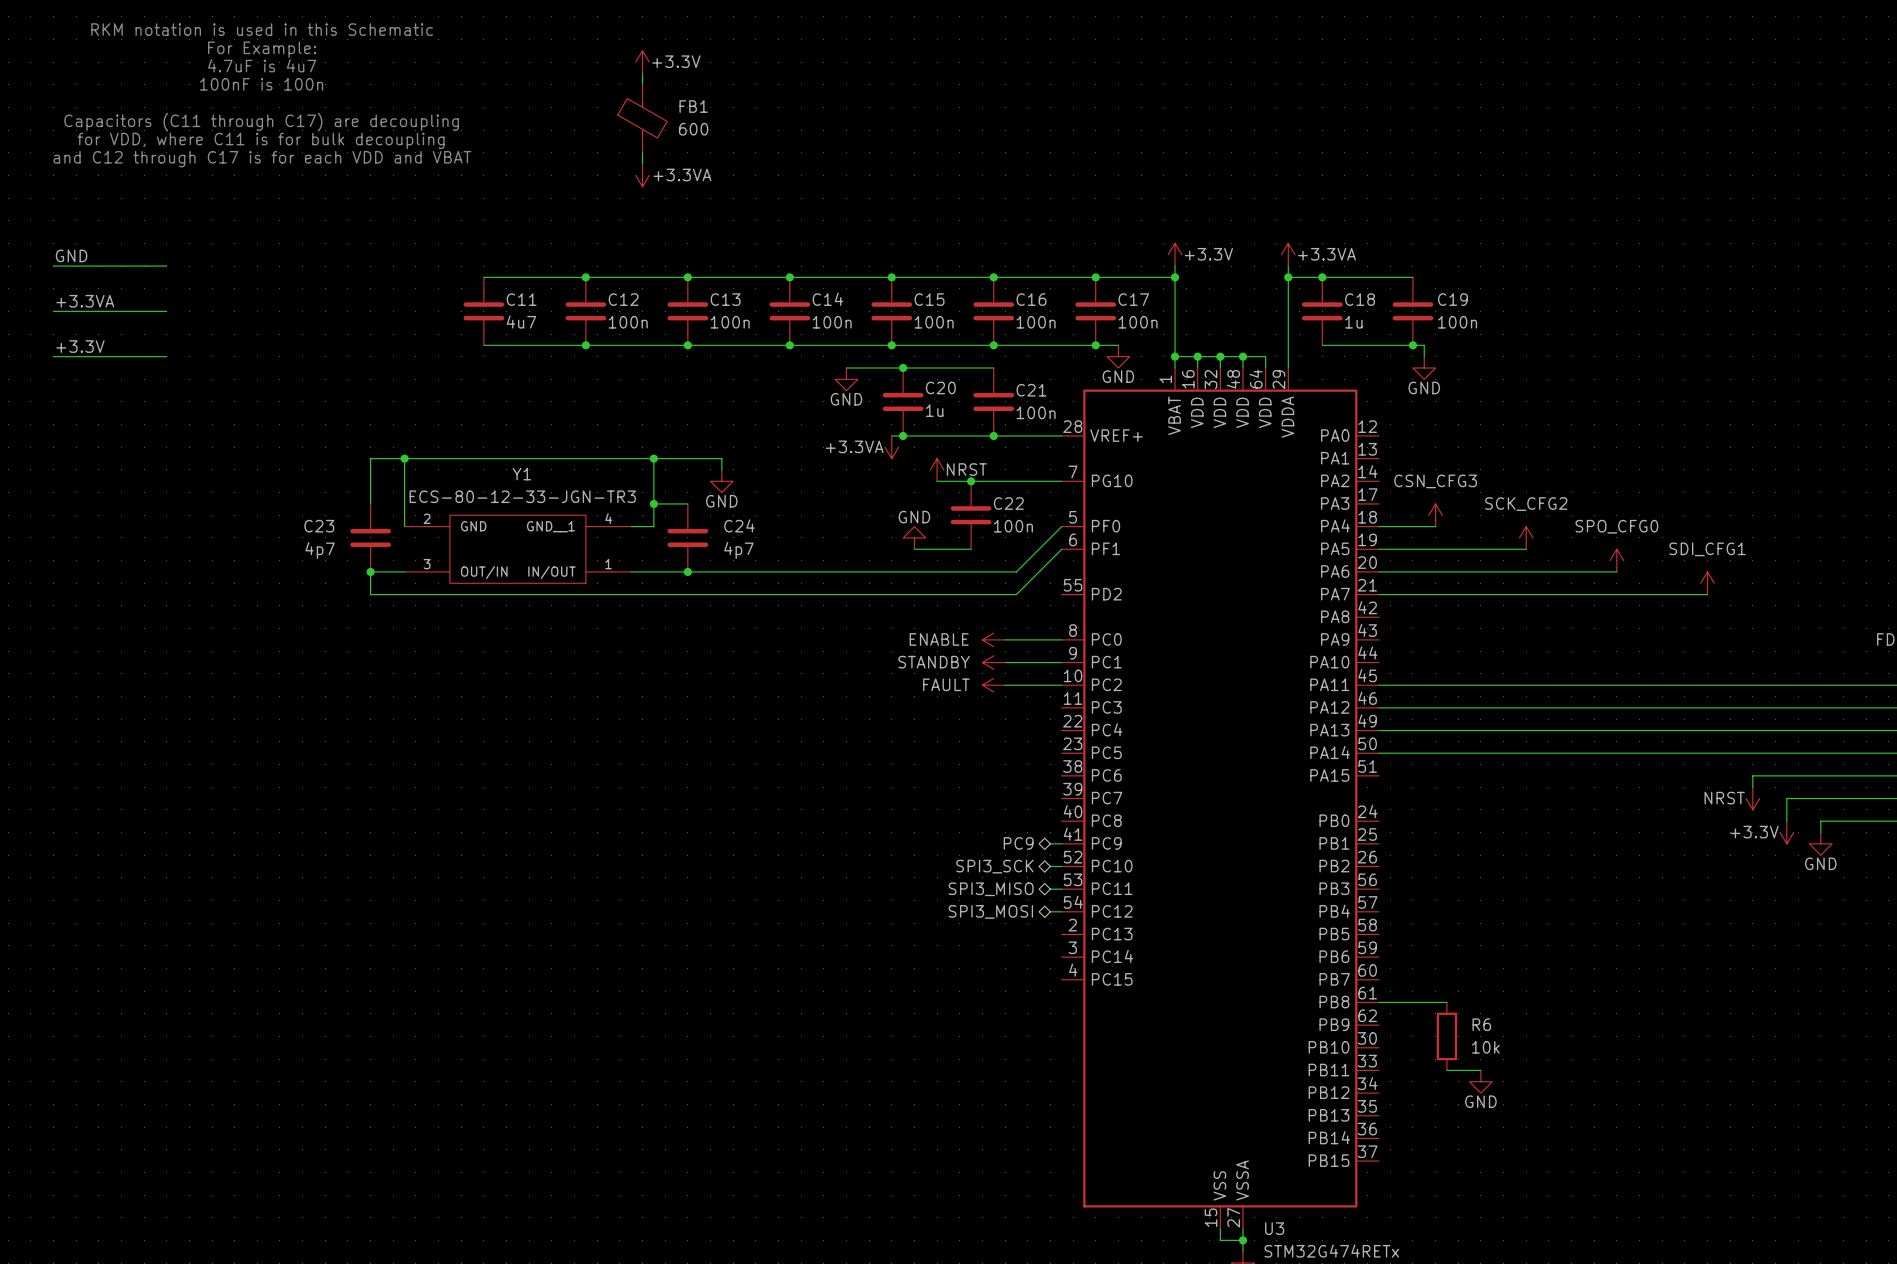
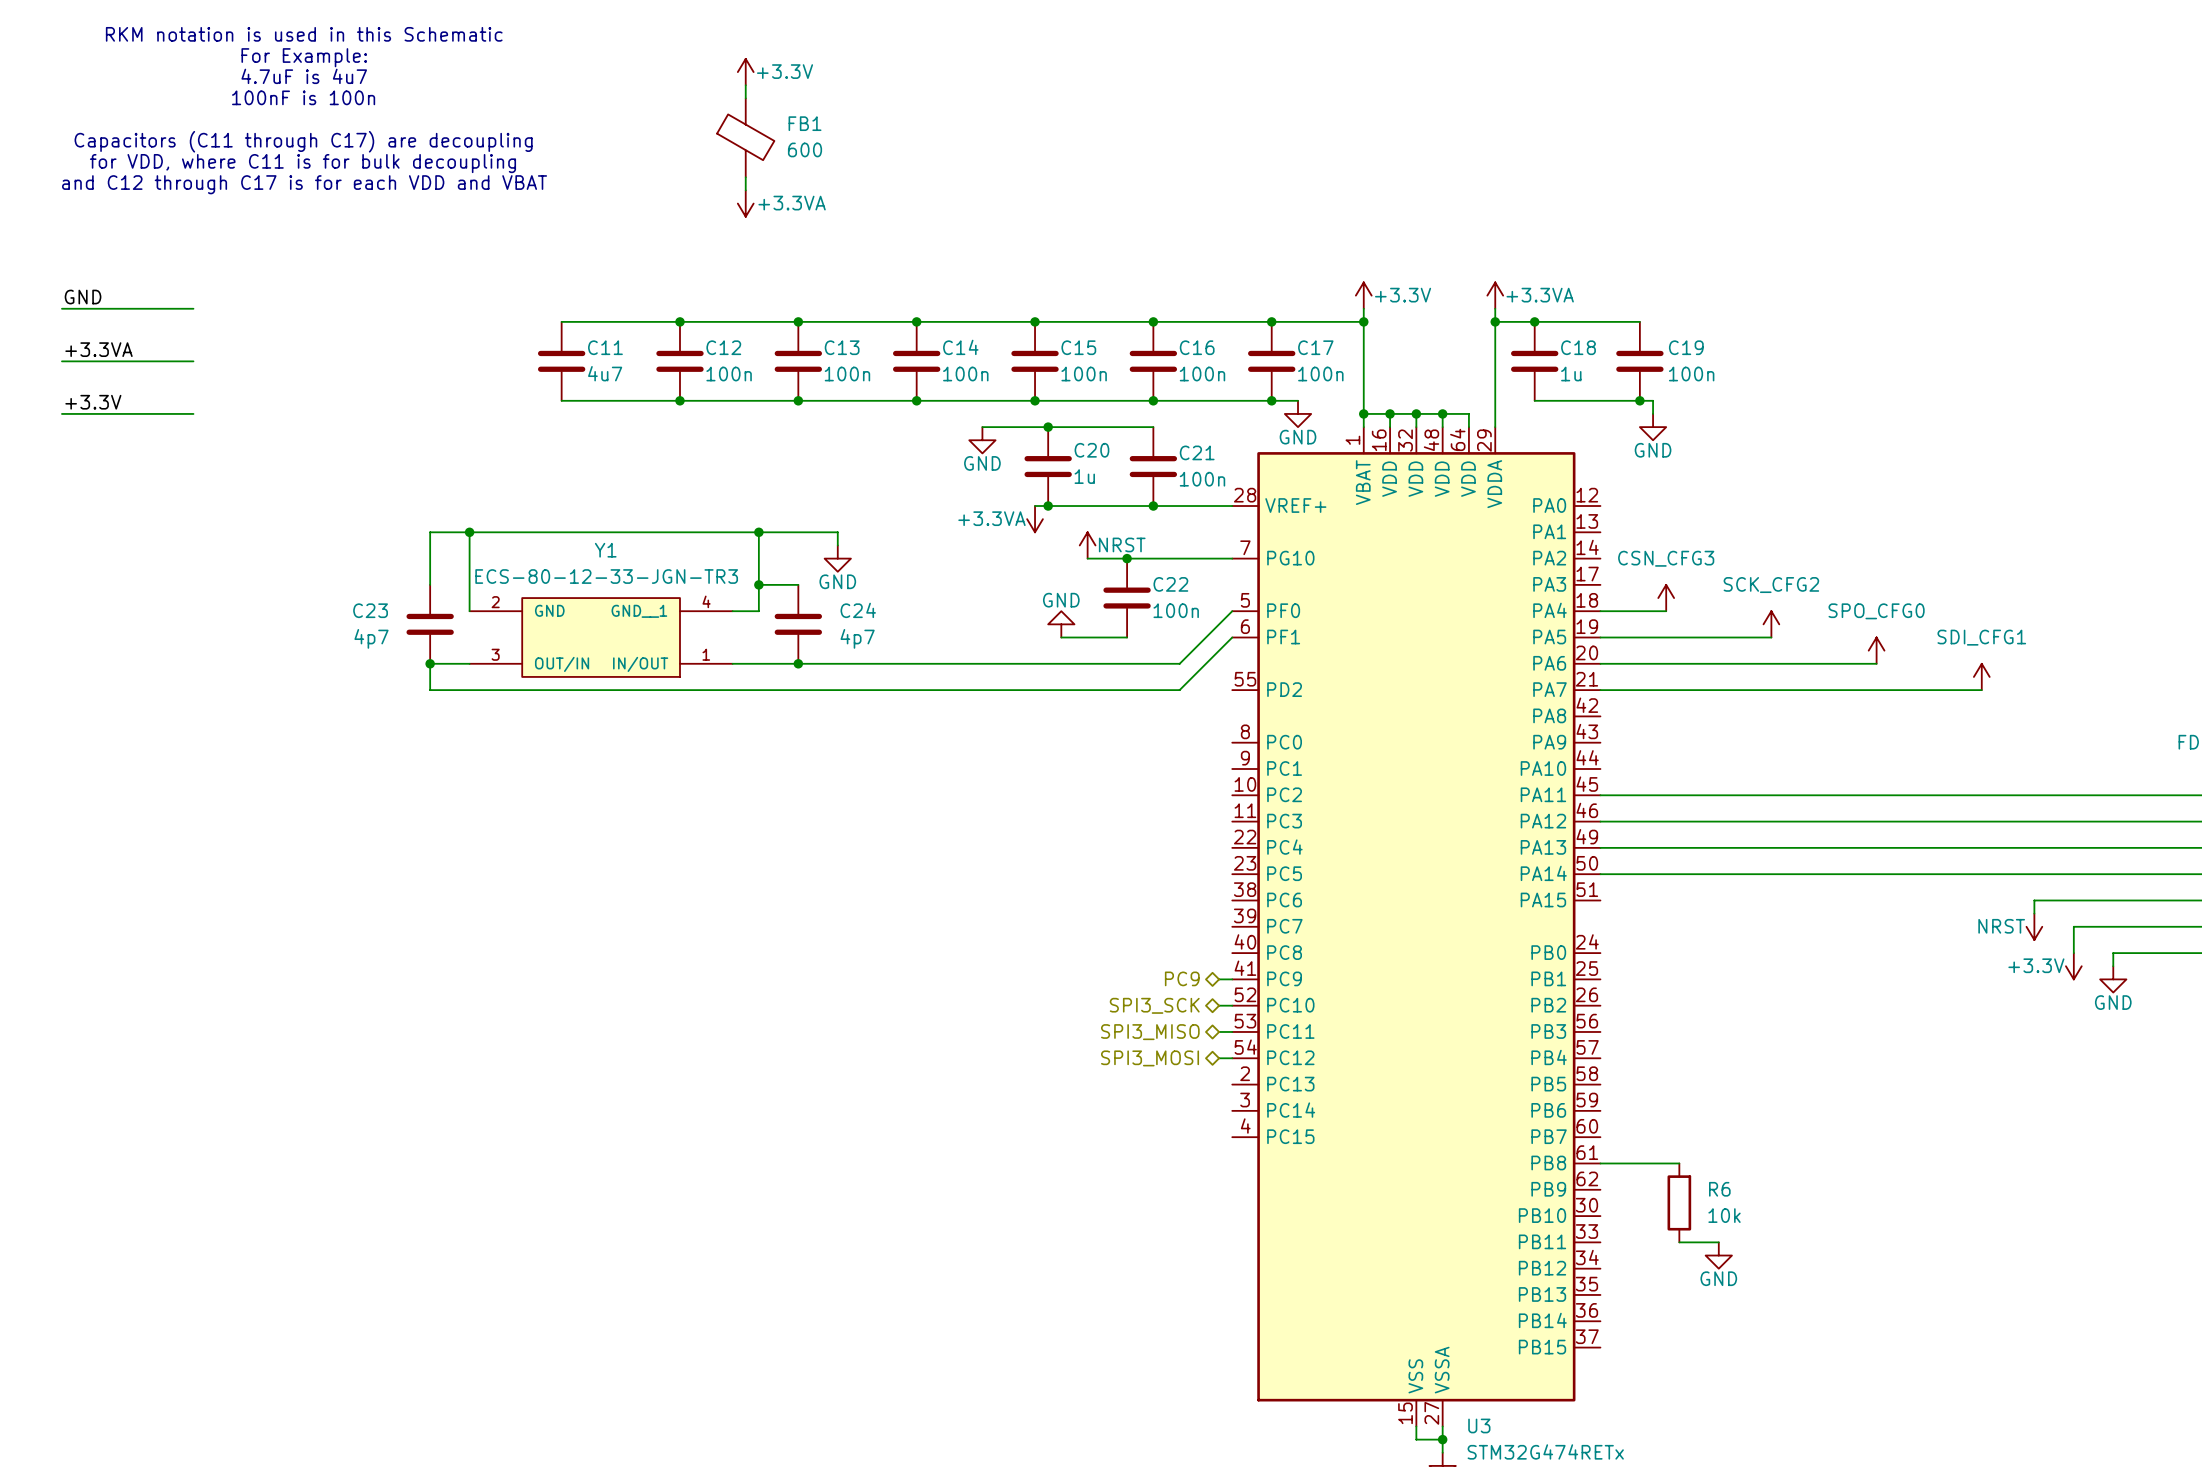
power symbol: ENABLE (993, 639) -> none
wire: (1005, 639) (1061, 639) -> none
power symbol: STANDBY (993, 662) -> none
wire: (1005, 662) (1061, 662) -> none
power symbol: FAULT (993, 685) -> none
wire: (1005, 685) (1061, 685) -> none

